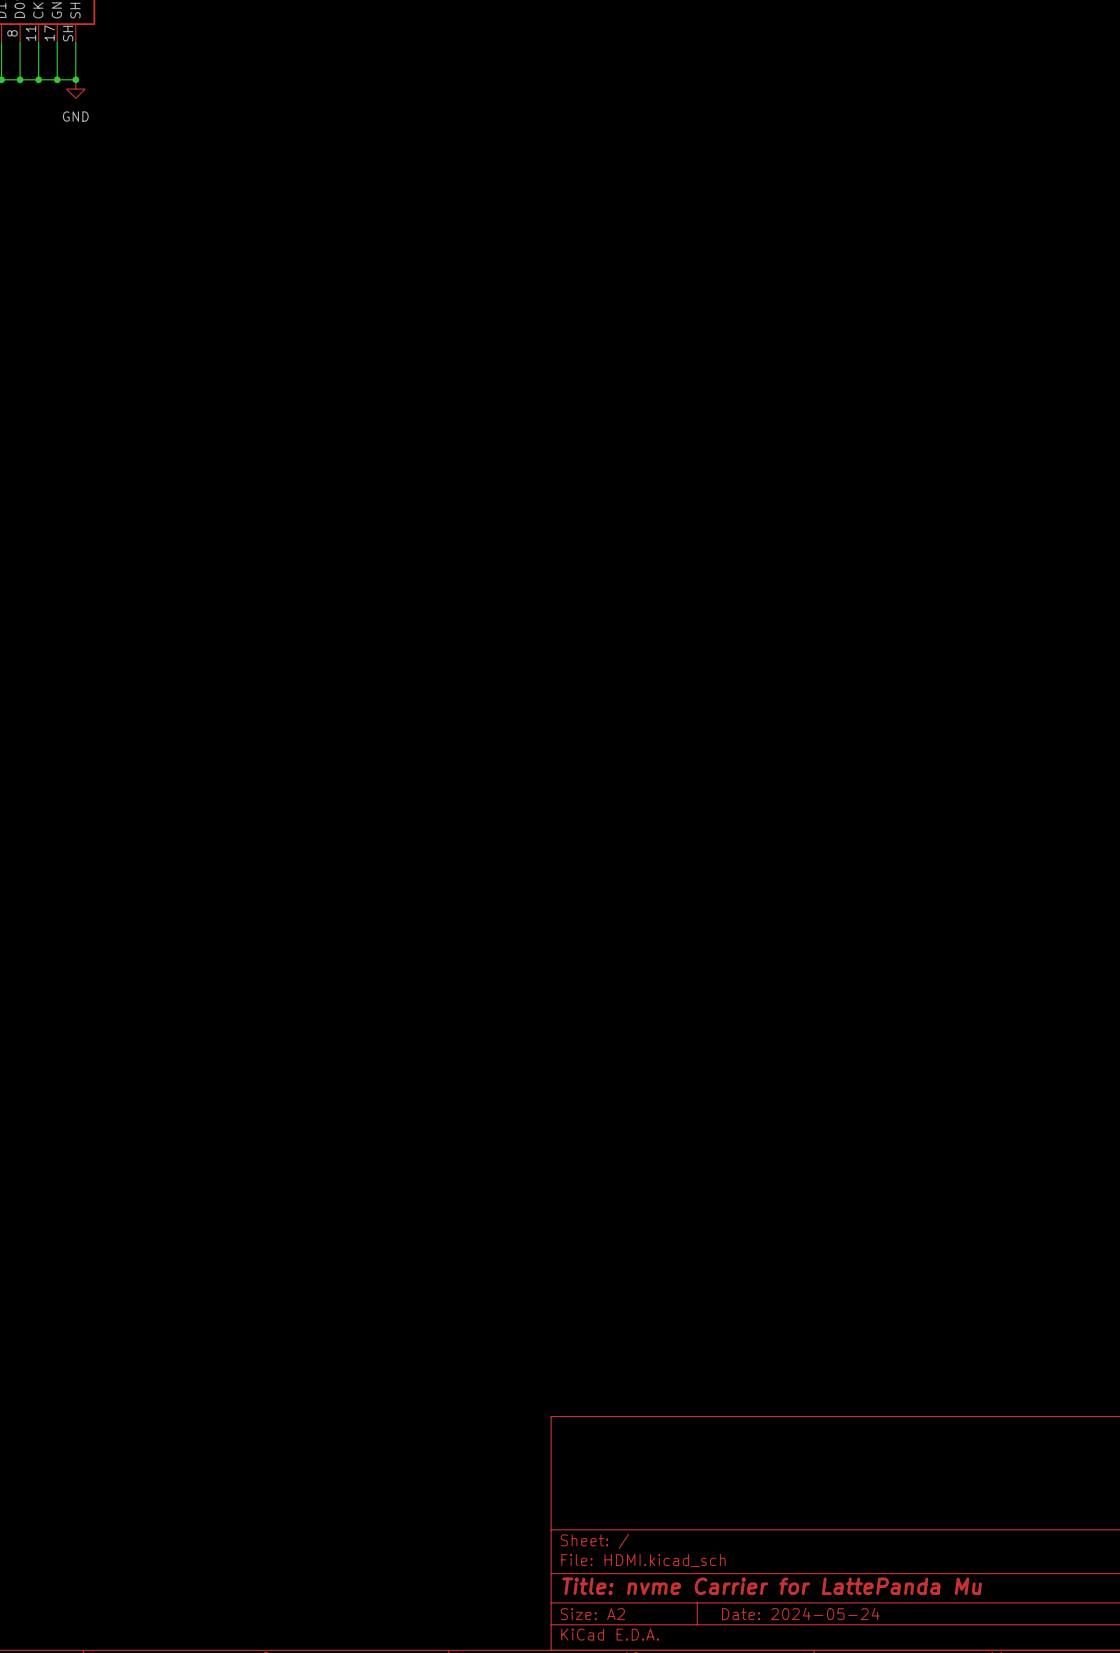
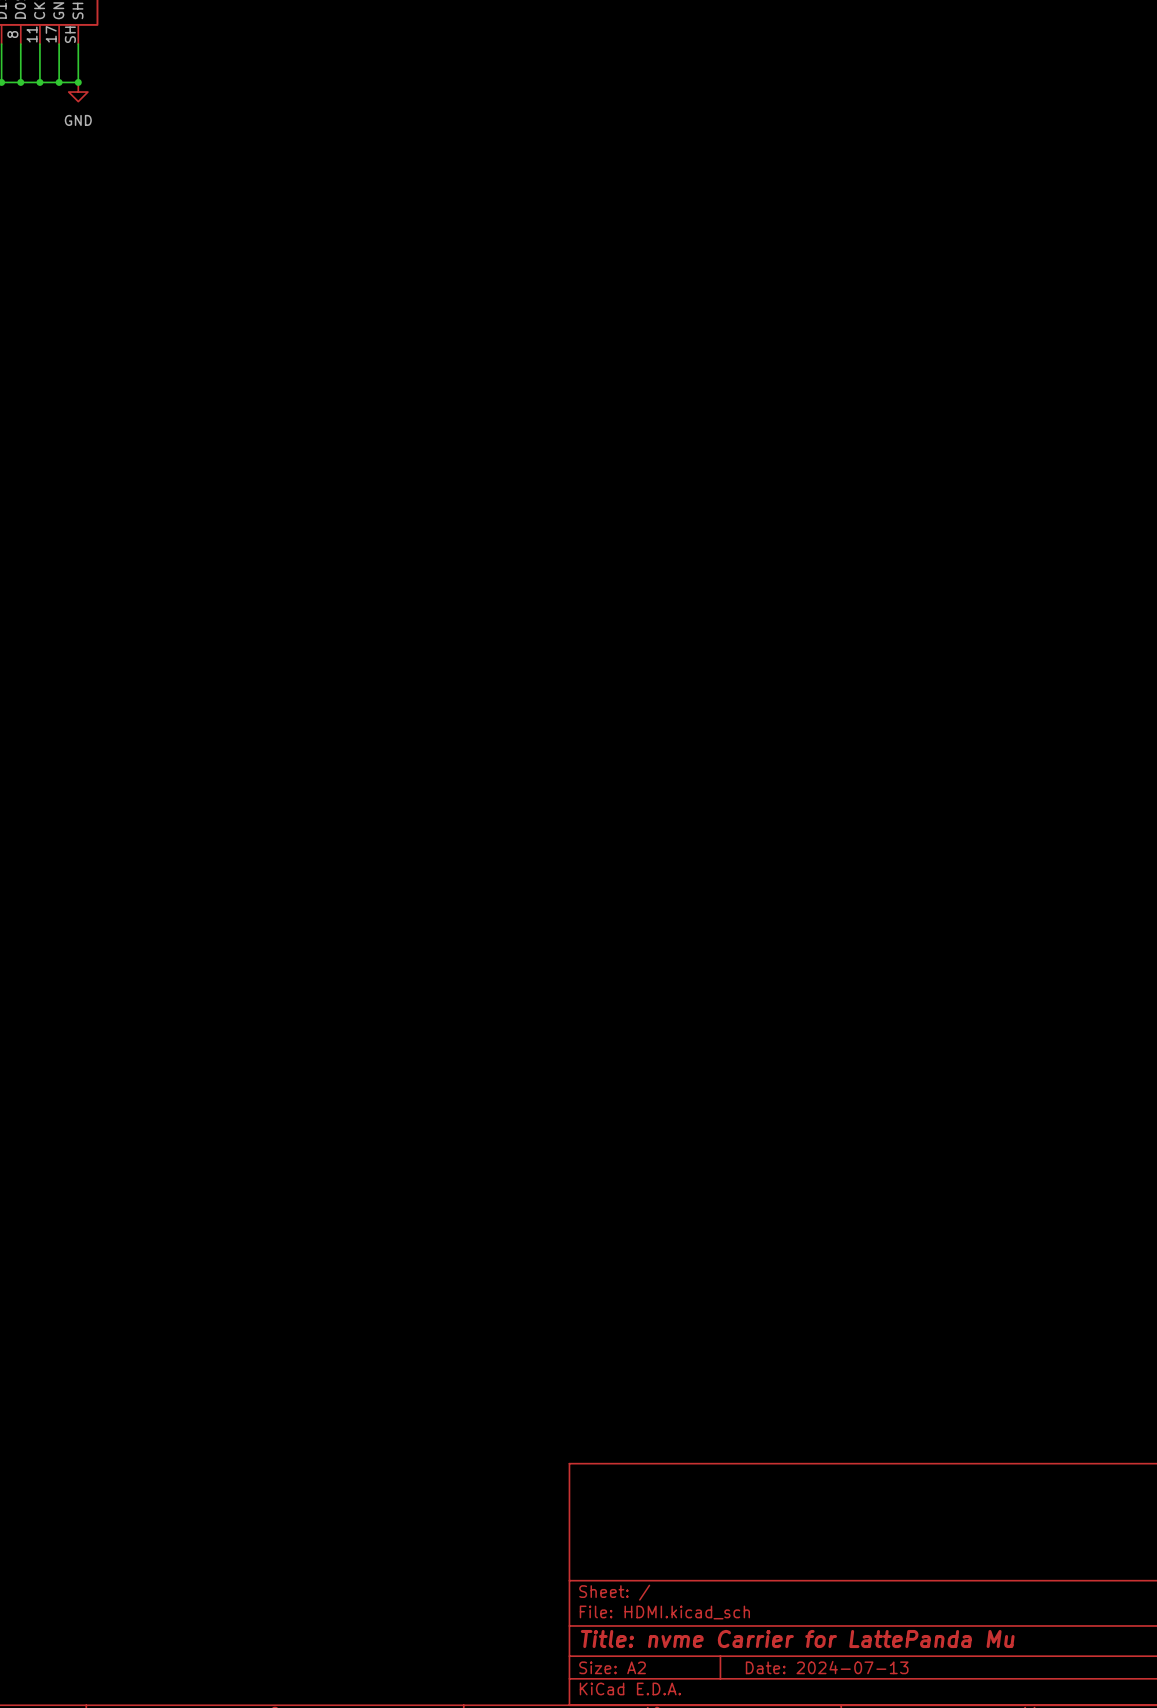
title block: Date: 2024-05-24 (800, 1613) -> Date: 2024-07-13 (827, 1667)

